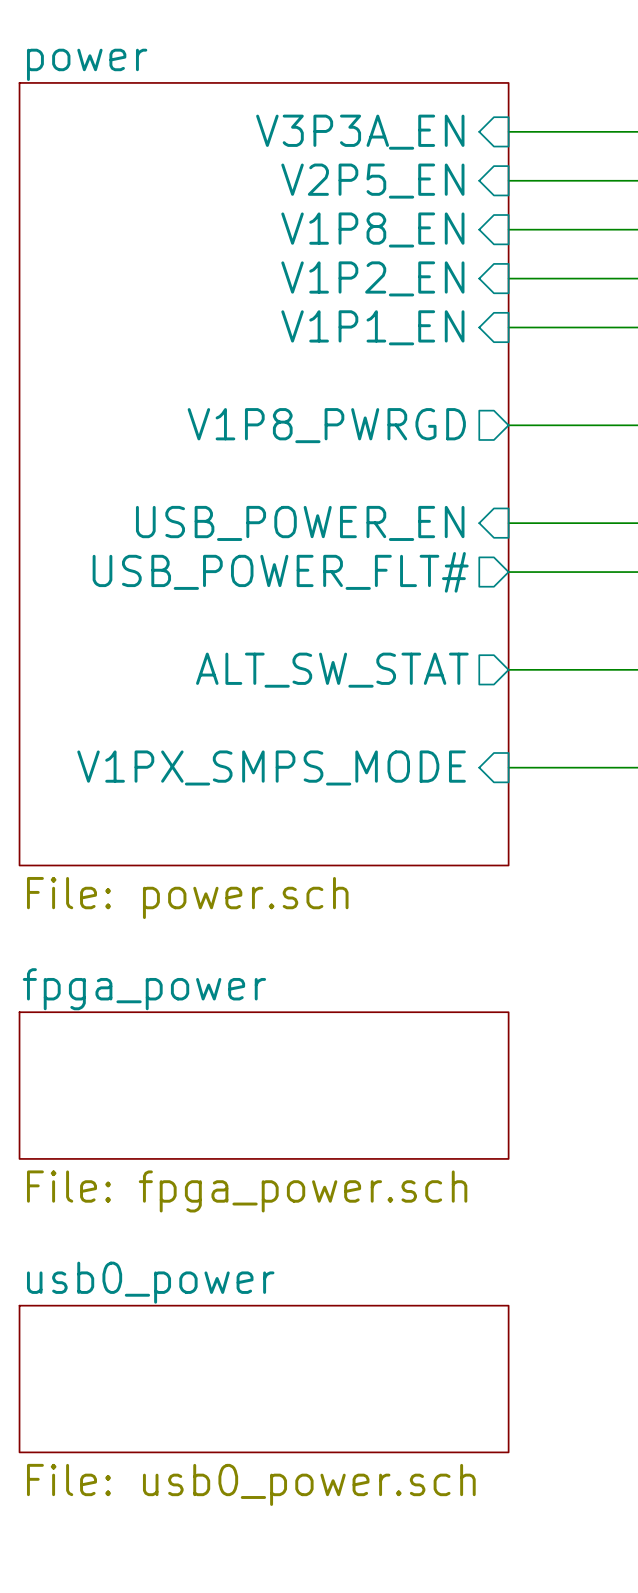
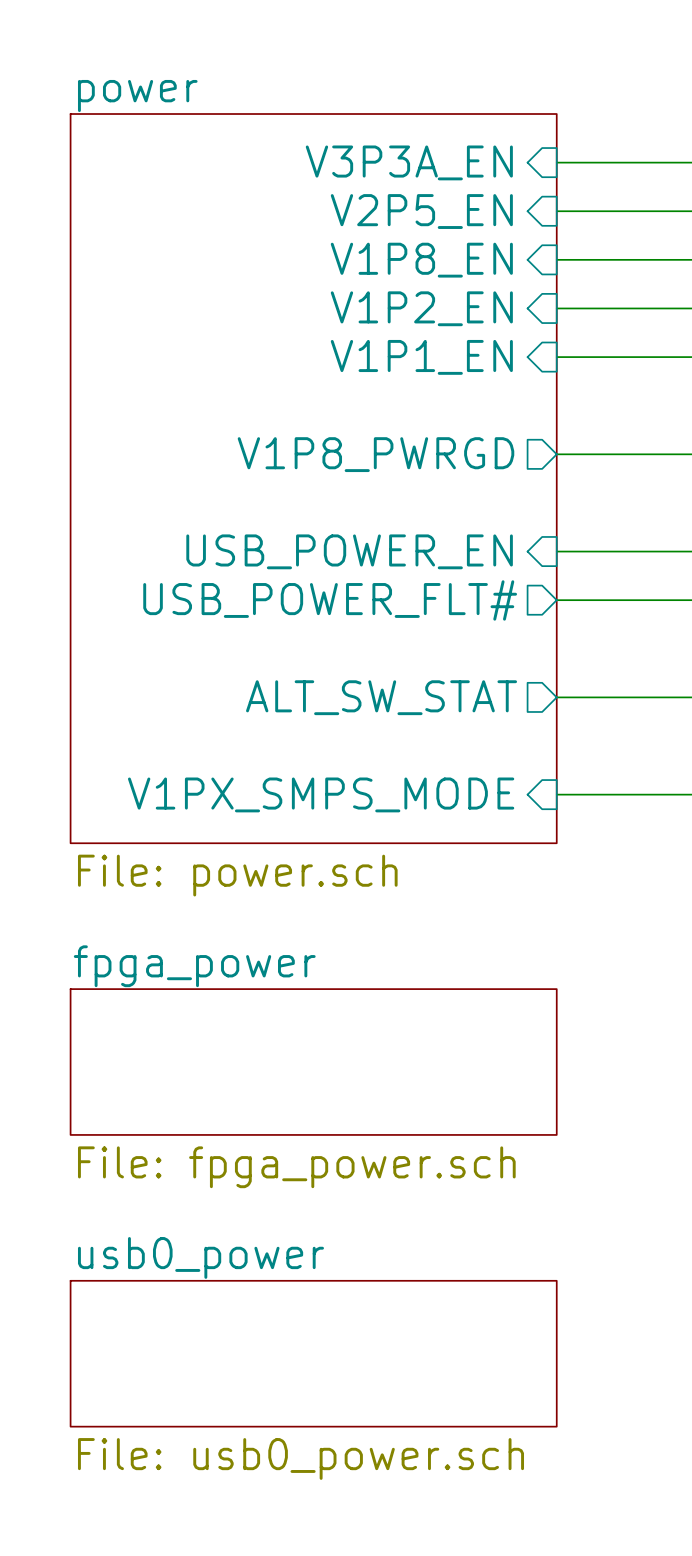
sheet power: none -> File: power.sch (313, 478)
sheet power: File: power.sch (264, 474) -> none
sheet fpga_power position: (264, 1085) -> (313, 1062)
sheet usb0_power position: (264, 1379) -> (313, 1353)

